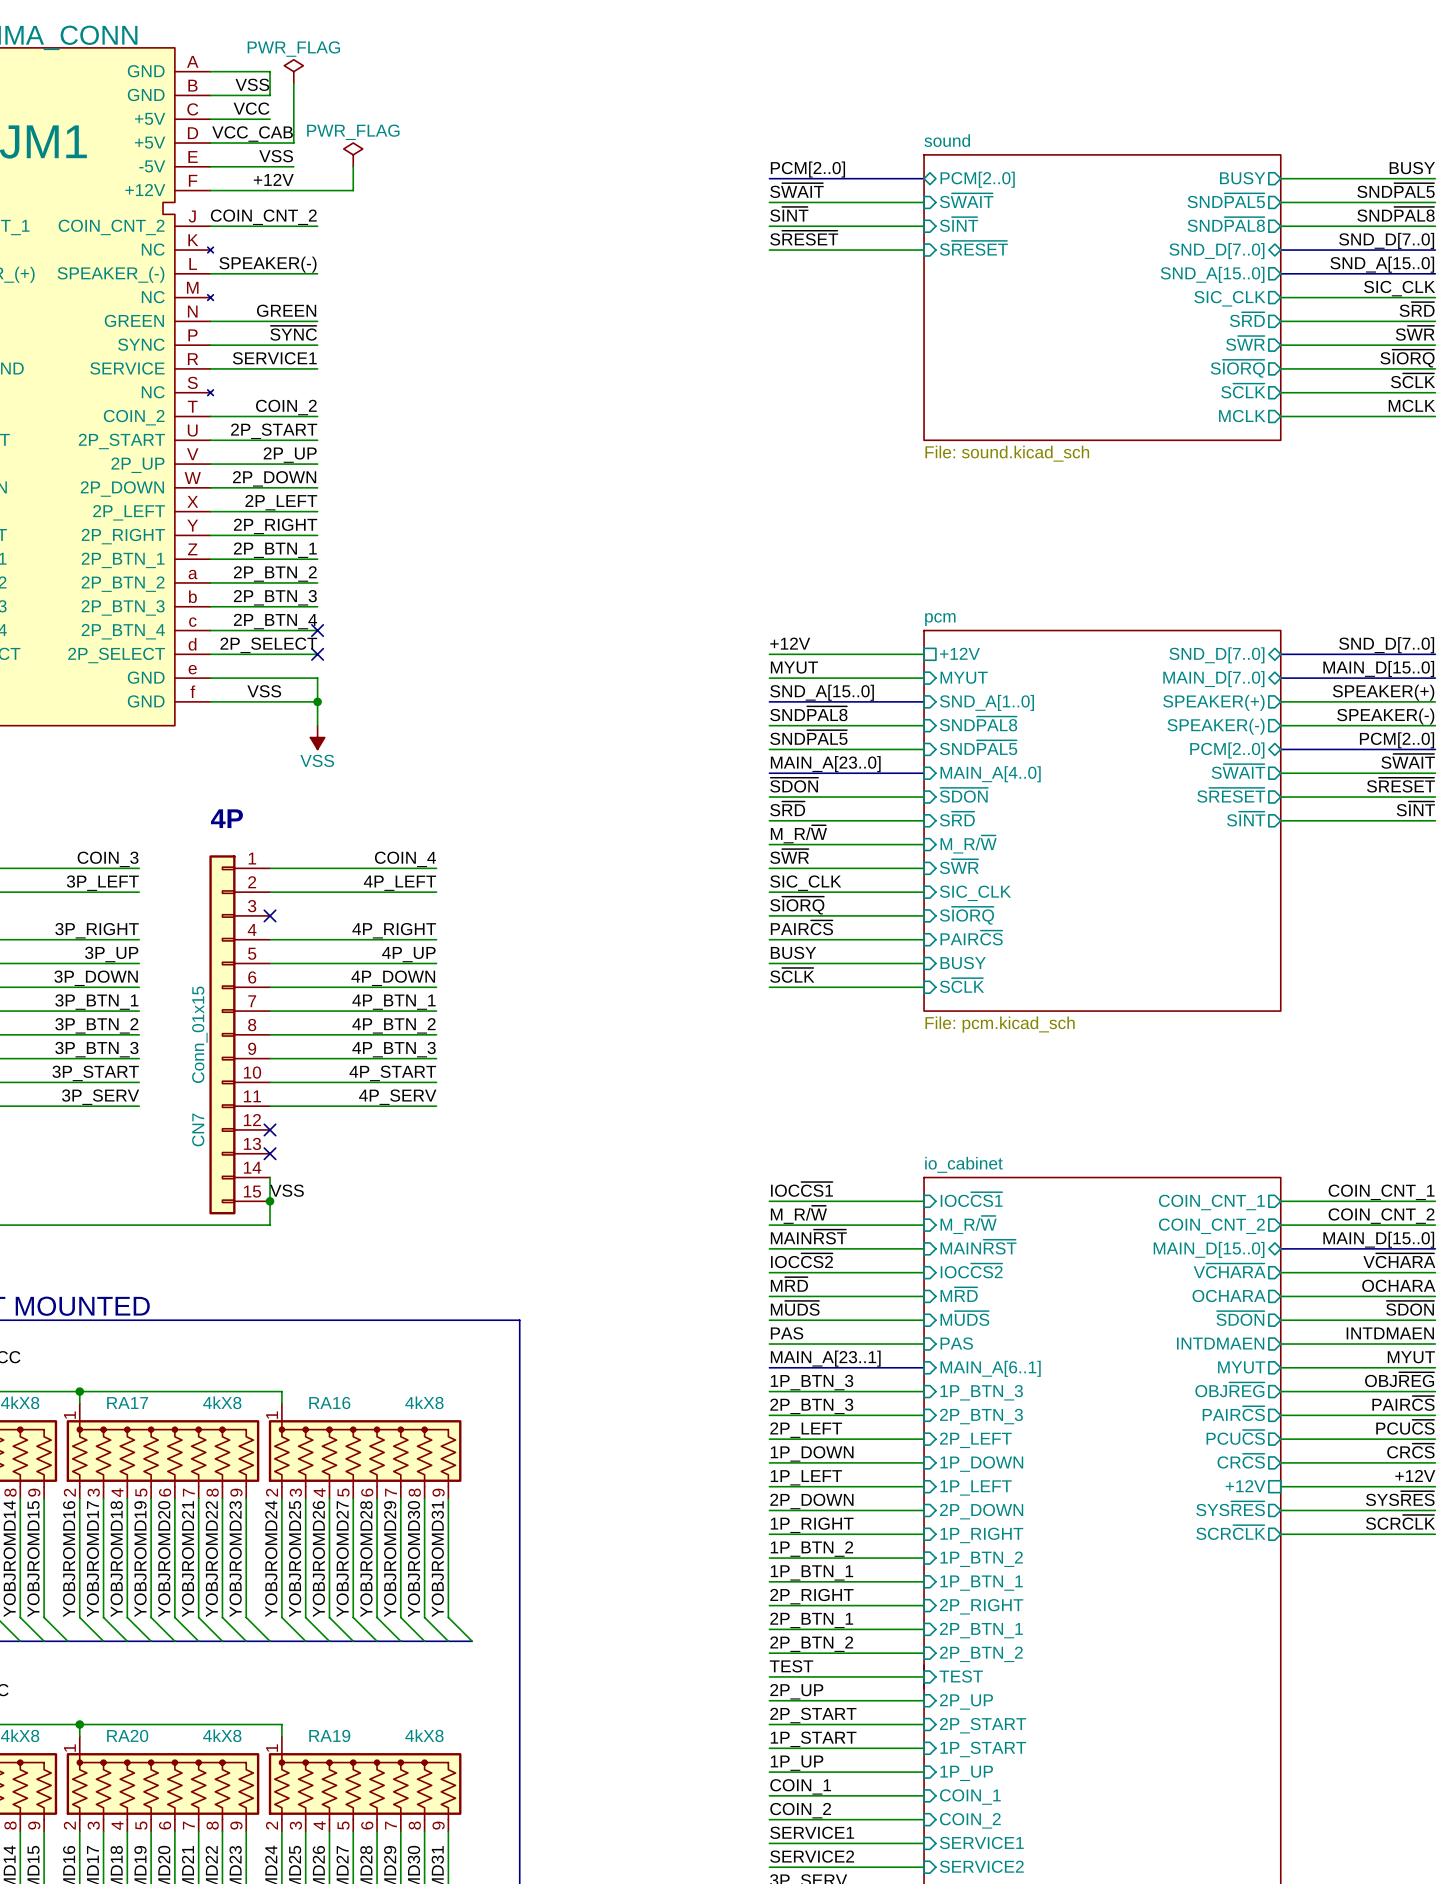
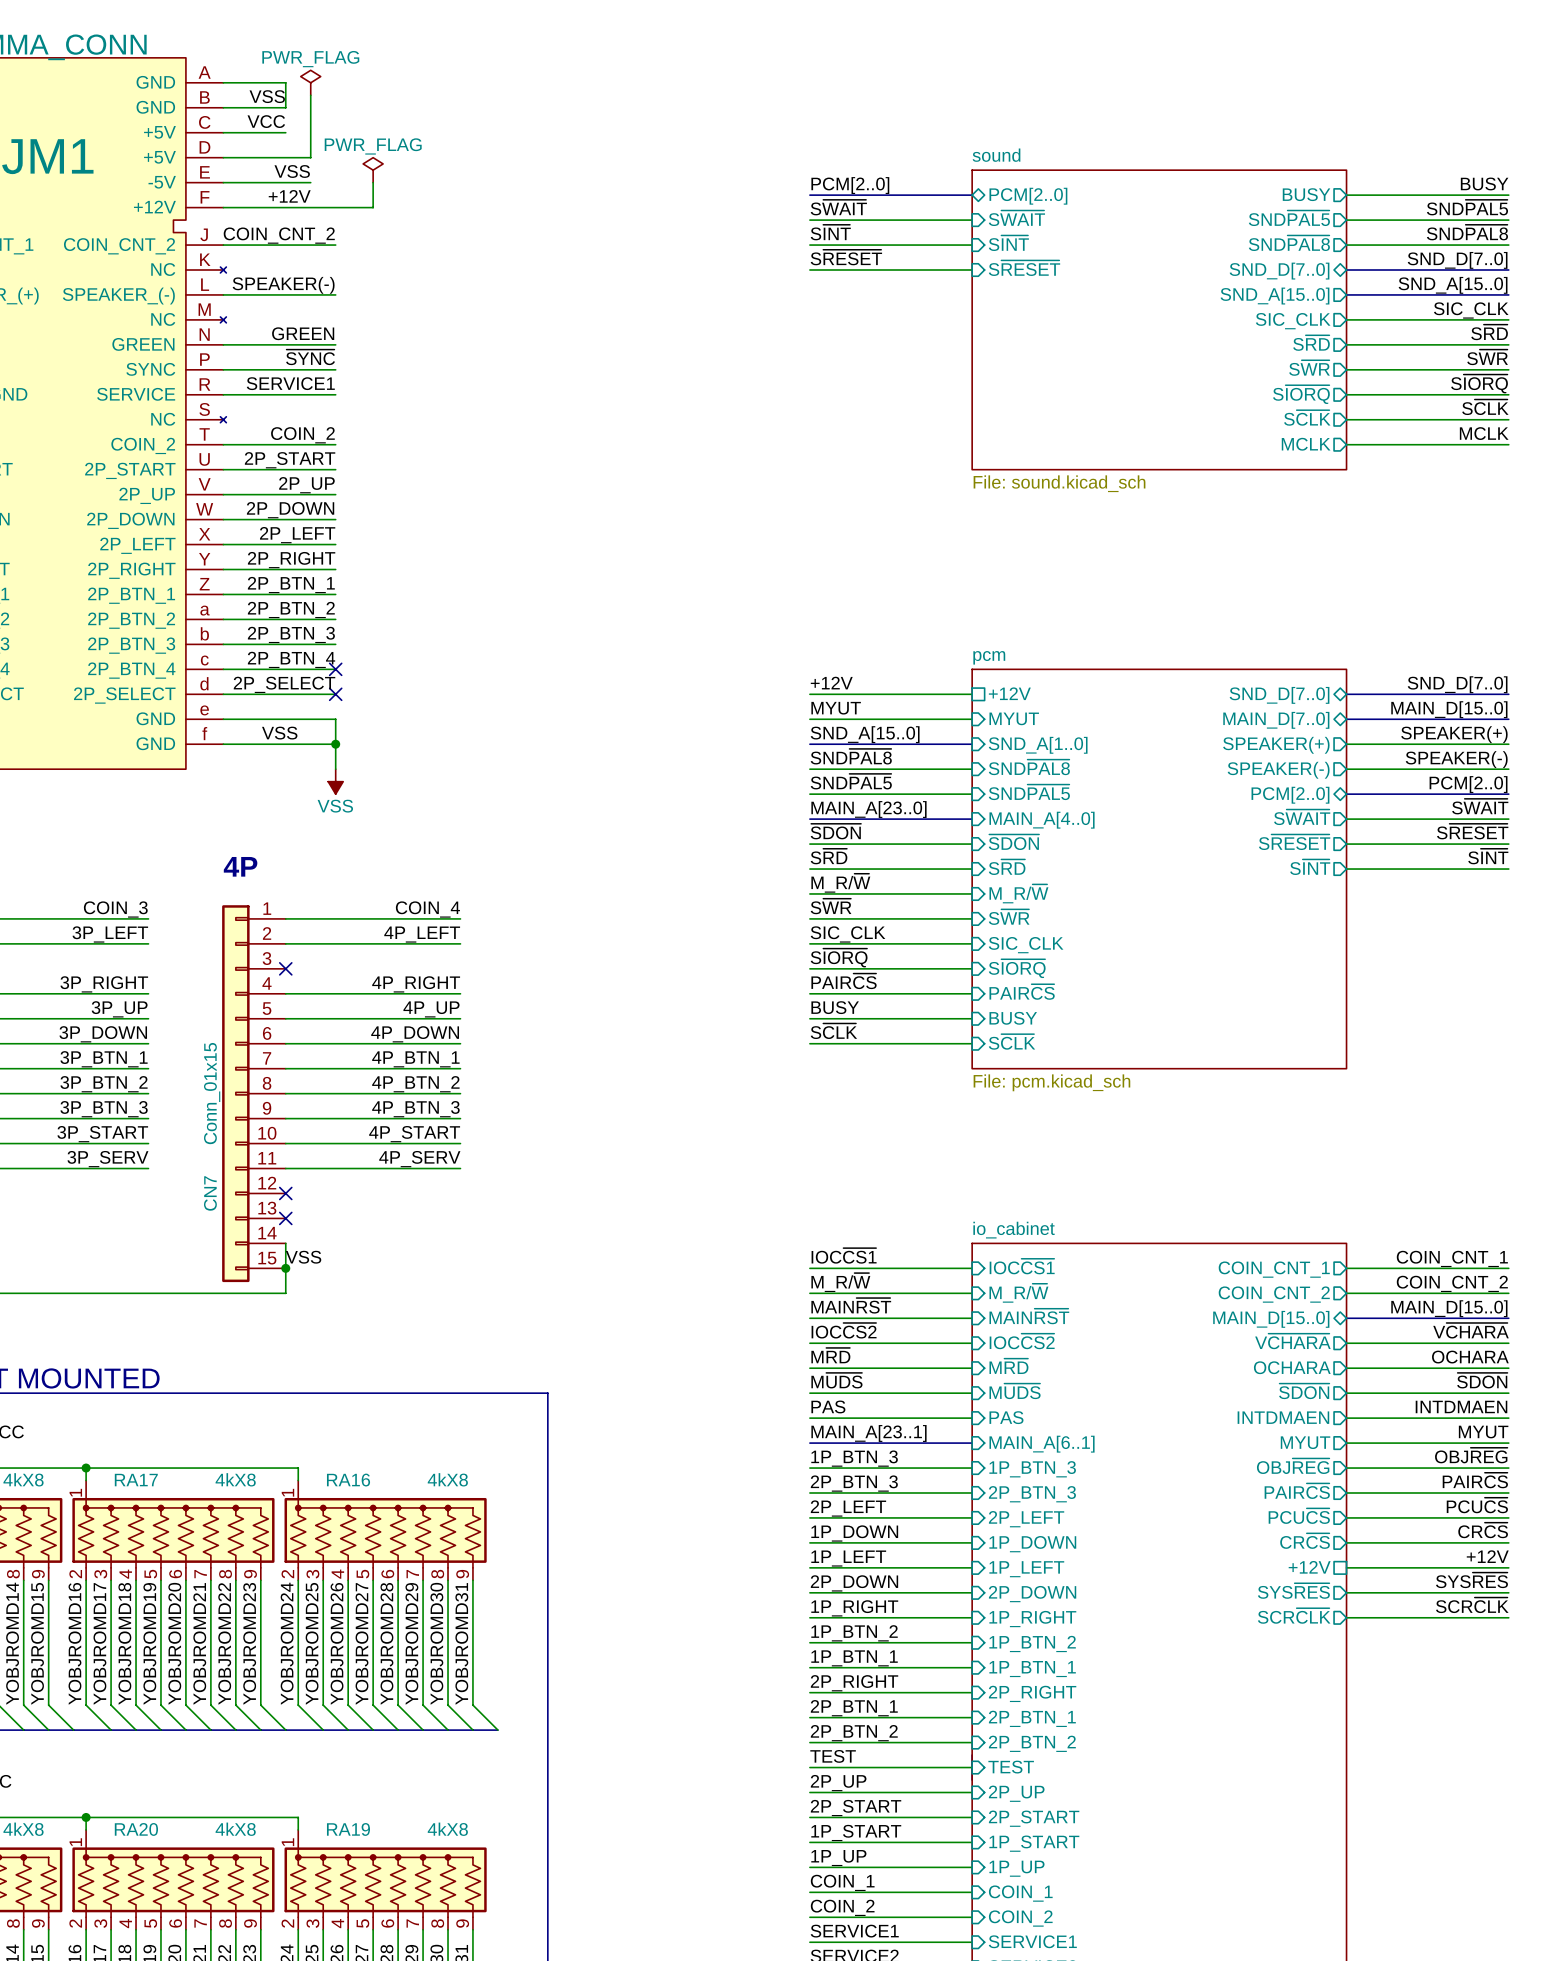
label: VCC_CAB (252, 134) -> none

